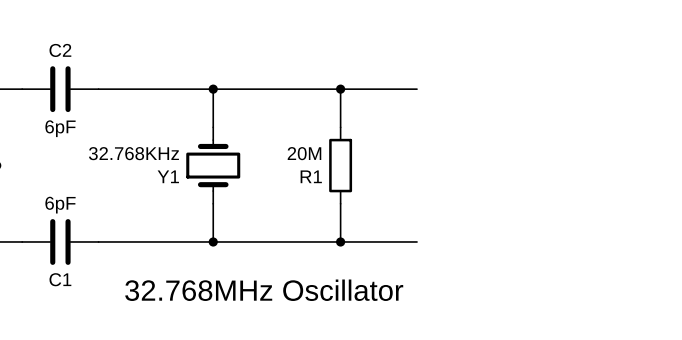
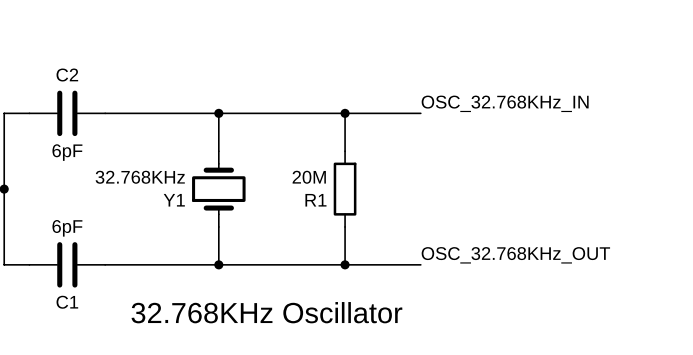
label: none -> OSC_32.768KHz_IN (505, 103)
label: none -> OSC_32.768KHz_OUT (515, 255)
text: 32.768MHz Oscillator (264, 290) -> 32.768KHz Oscillator (266, 312)

